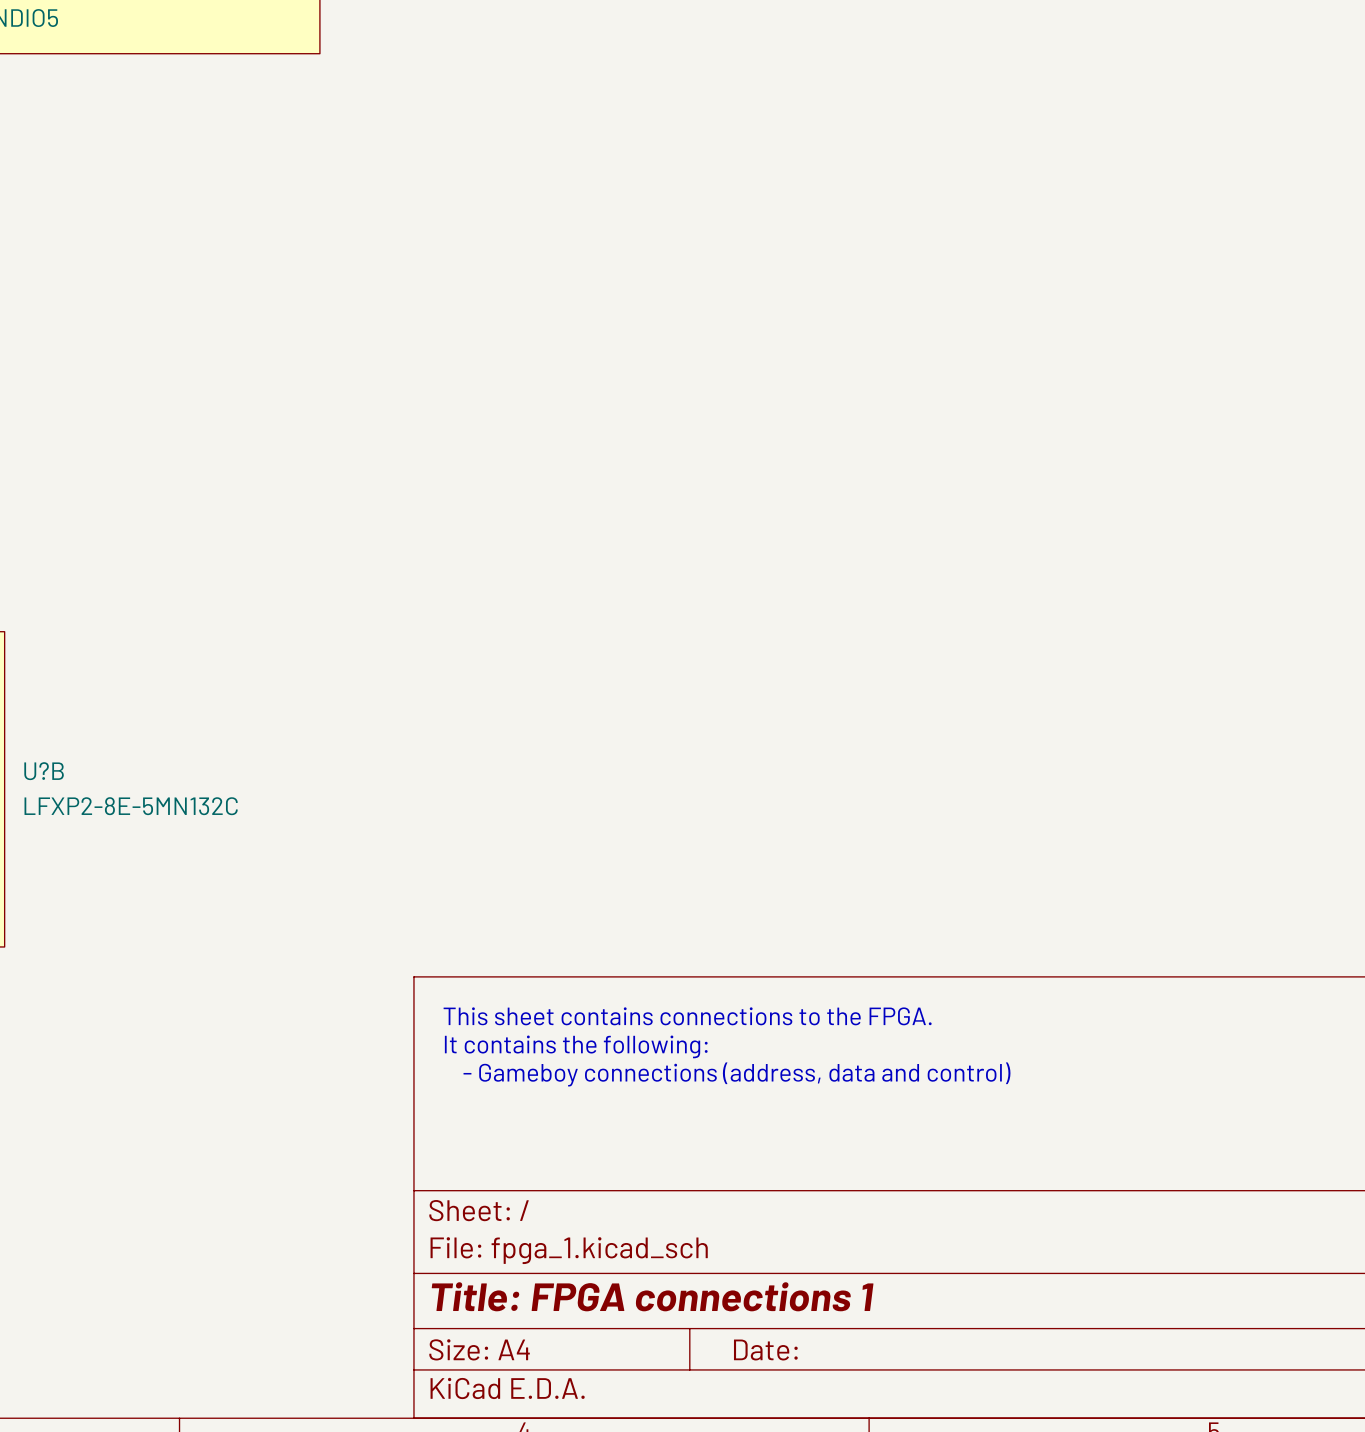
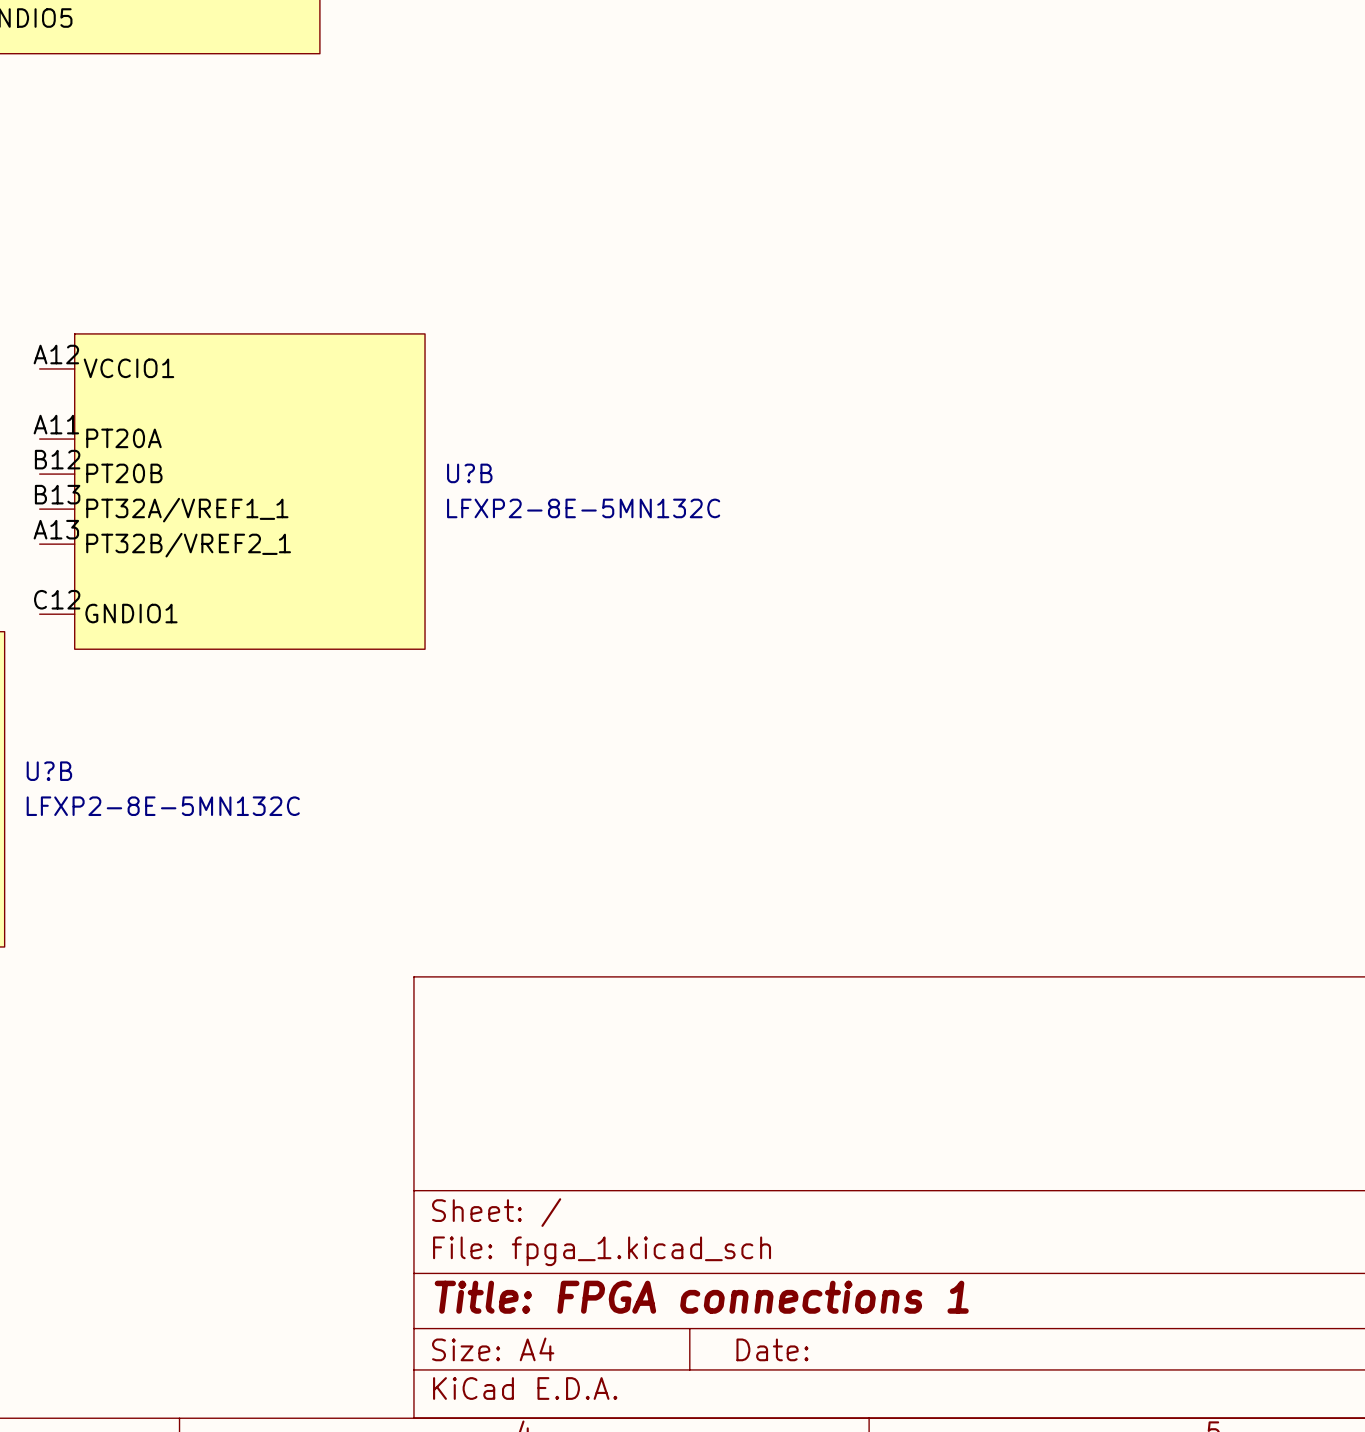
U?B: none -> LFXP2-8E-5MN132C (232, 491)
text: This sheet contains connections to the FPGA. (687, 1016) -> none
text: It contains the following: (576, 1046) -> none
text: - Gameboy connections (address, data and control) (736, 1074) -> none

